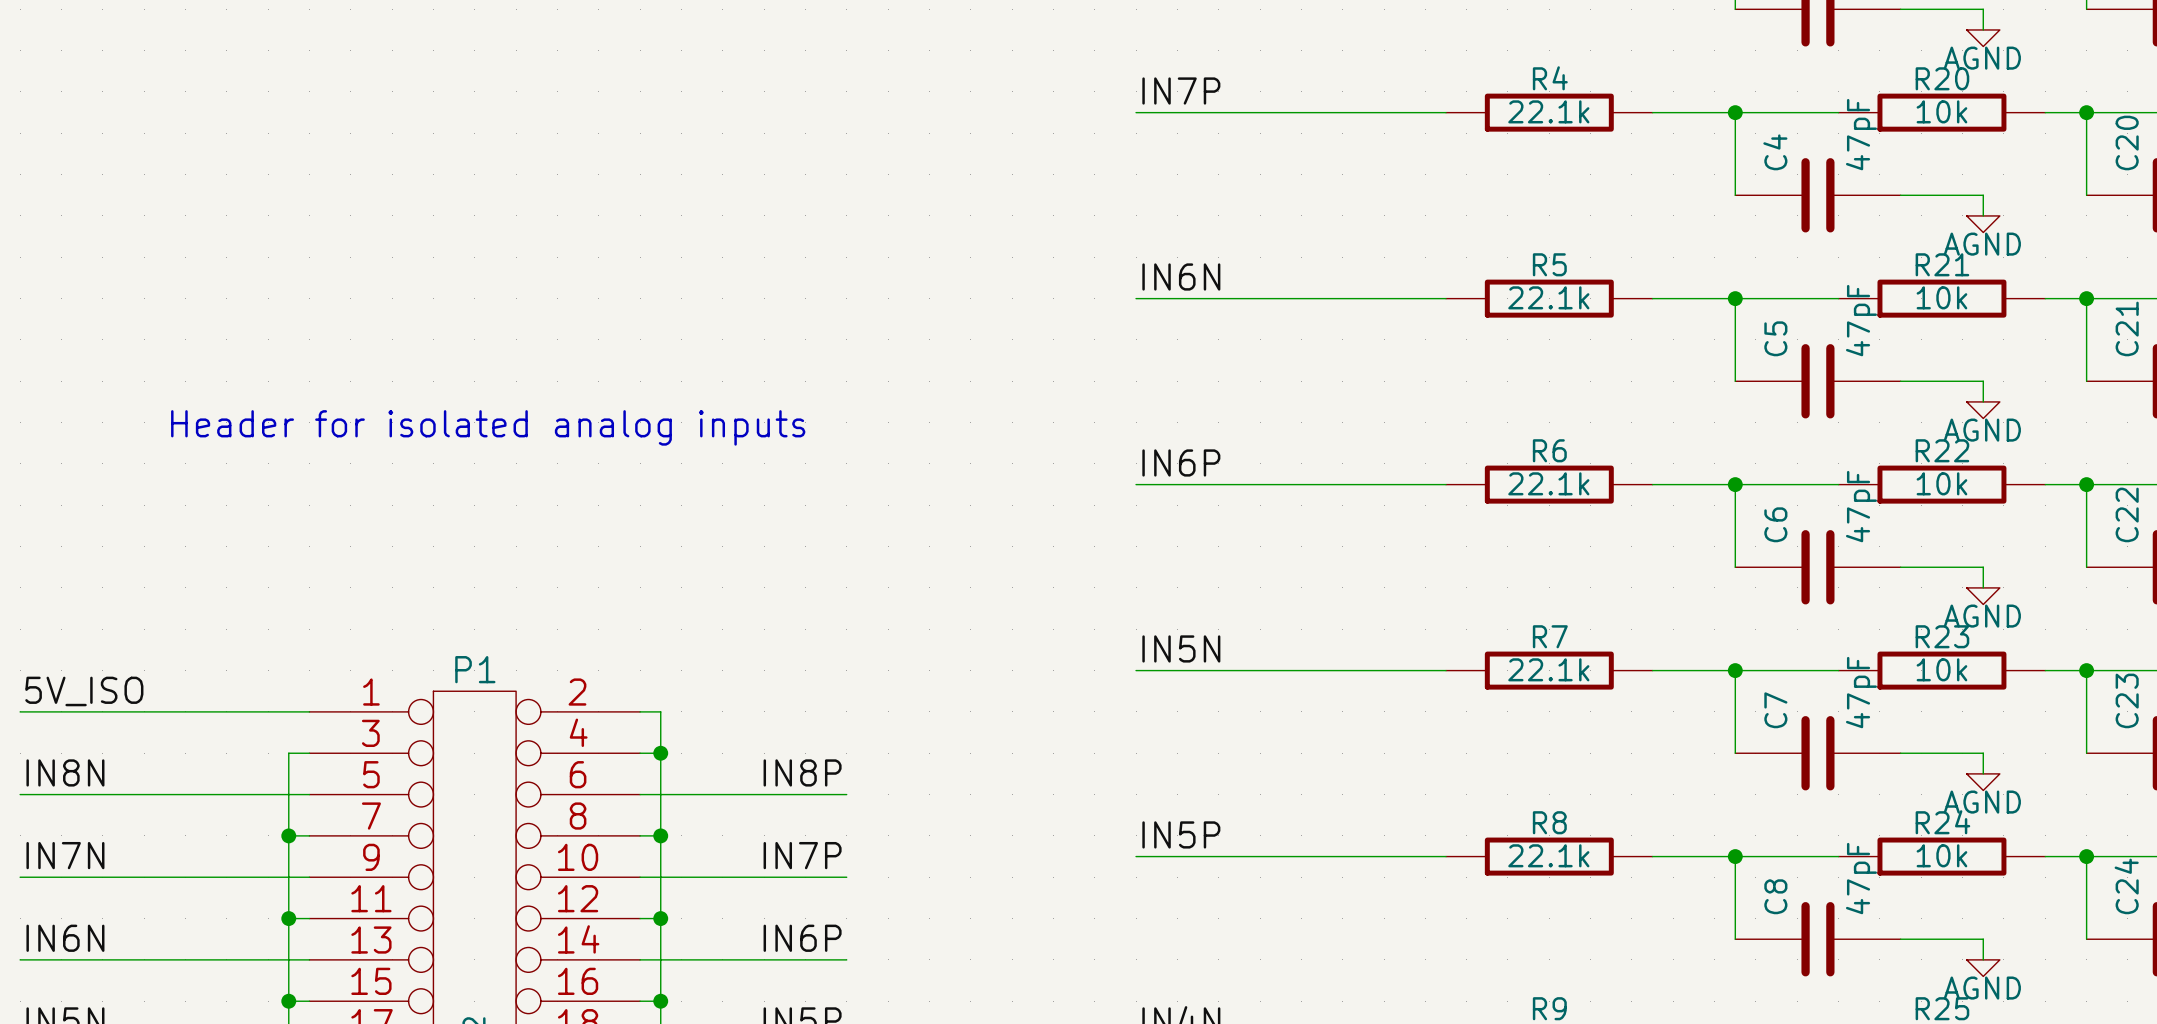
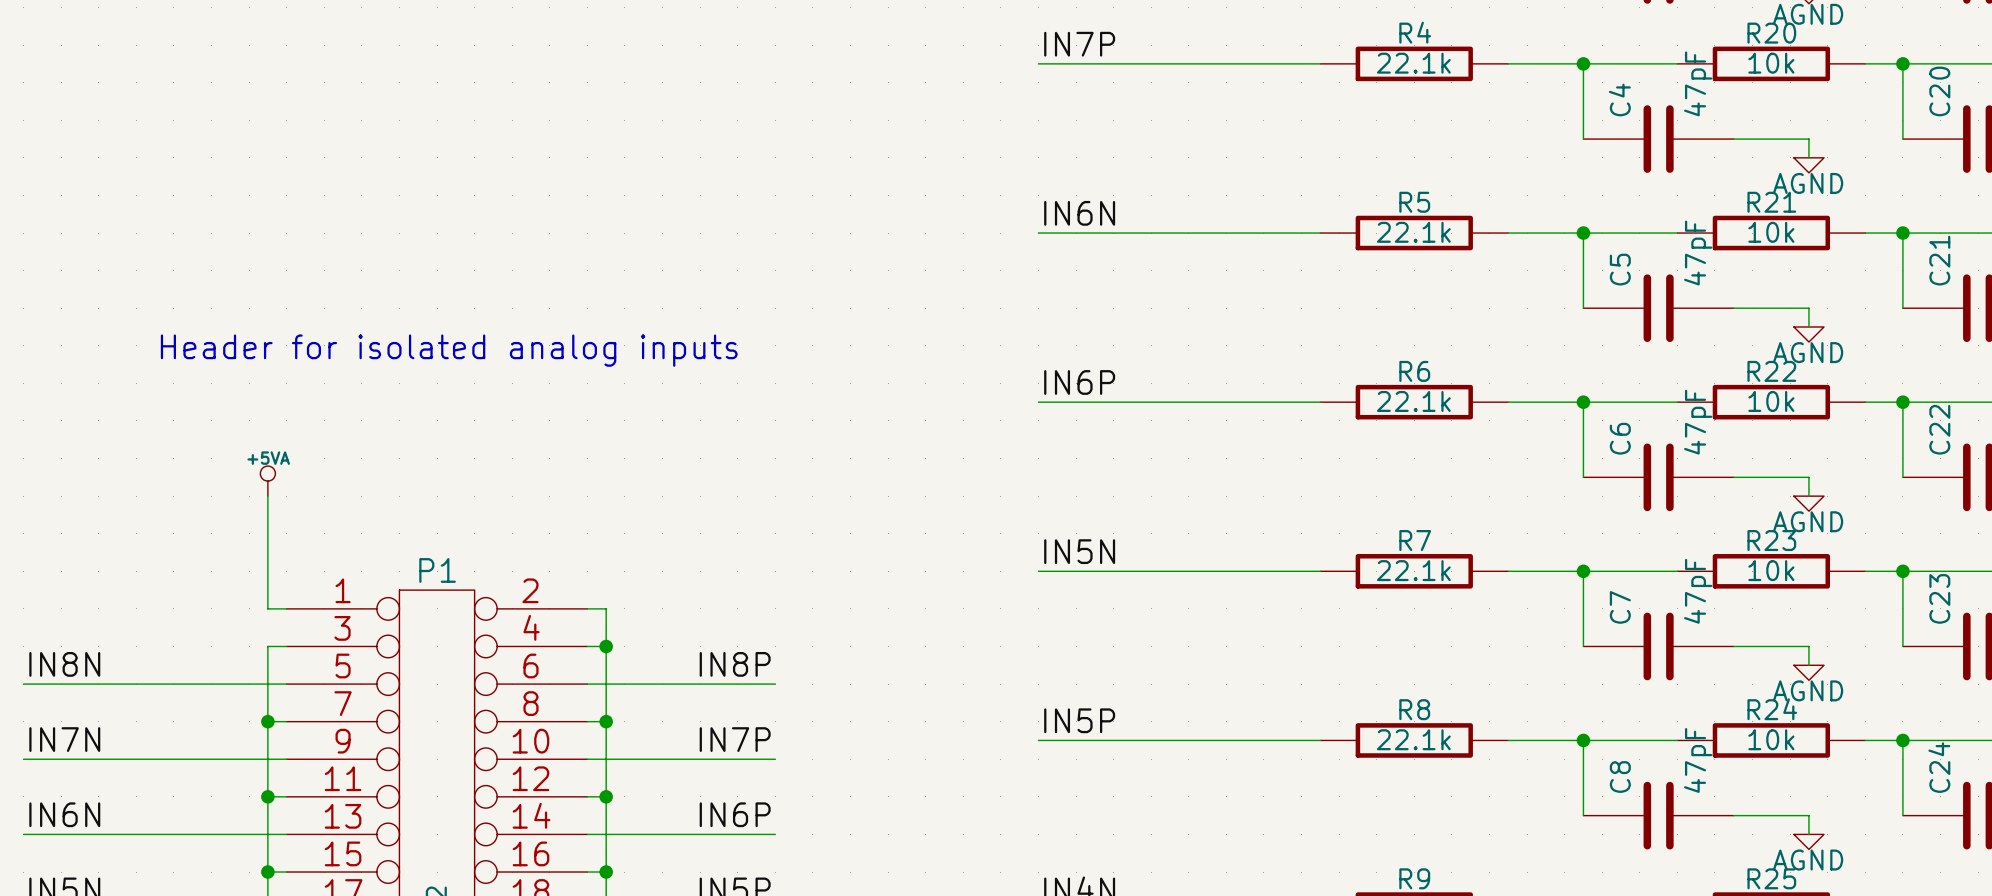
power symbol: none -> +5VA (267, 481)
label: 5V_ISO (84, 691) -> none
wire: (20, 711) (288, 711) -> (267, 496) (267, 608)

